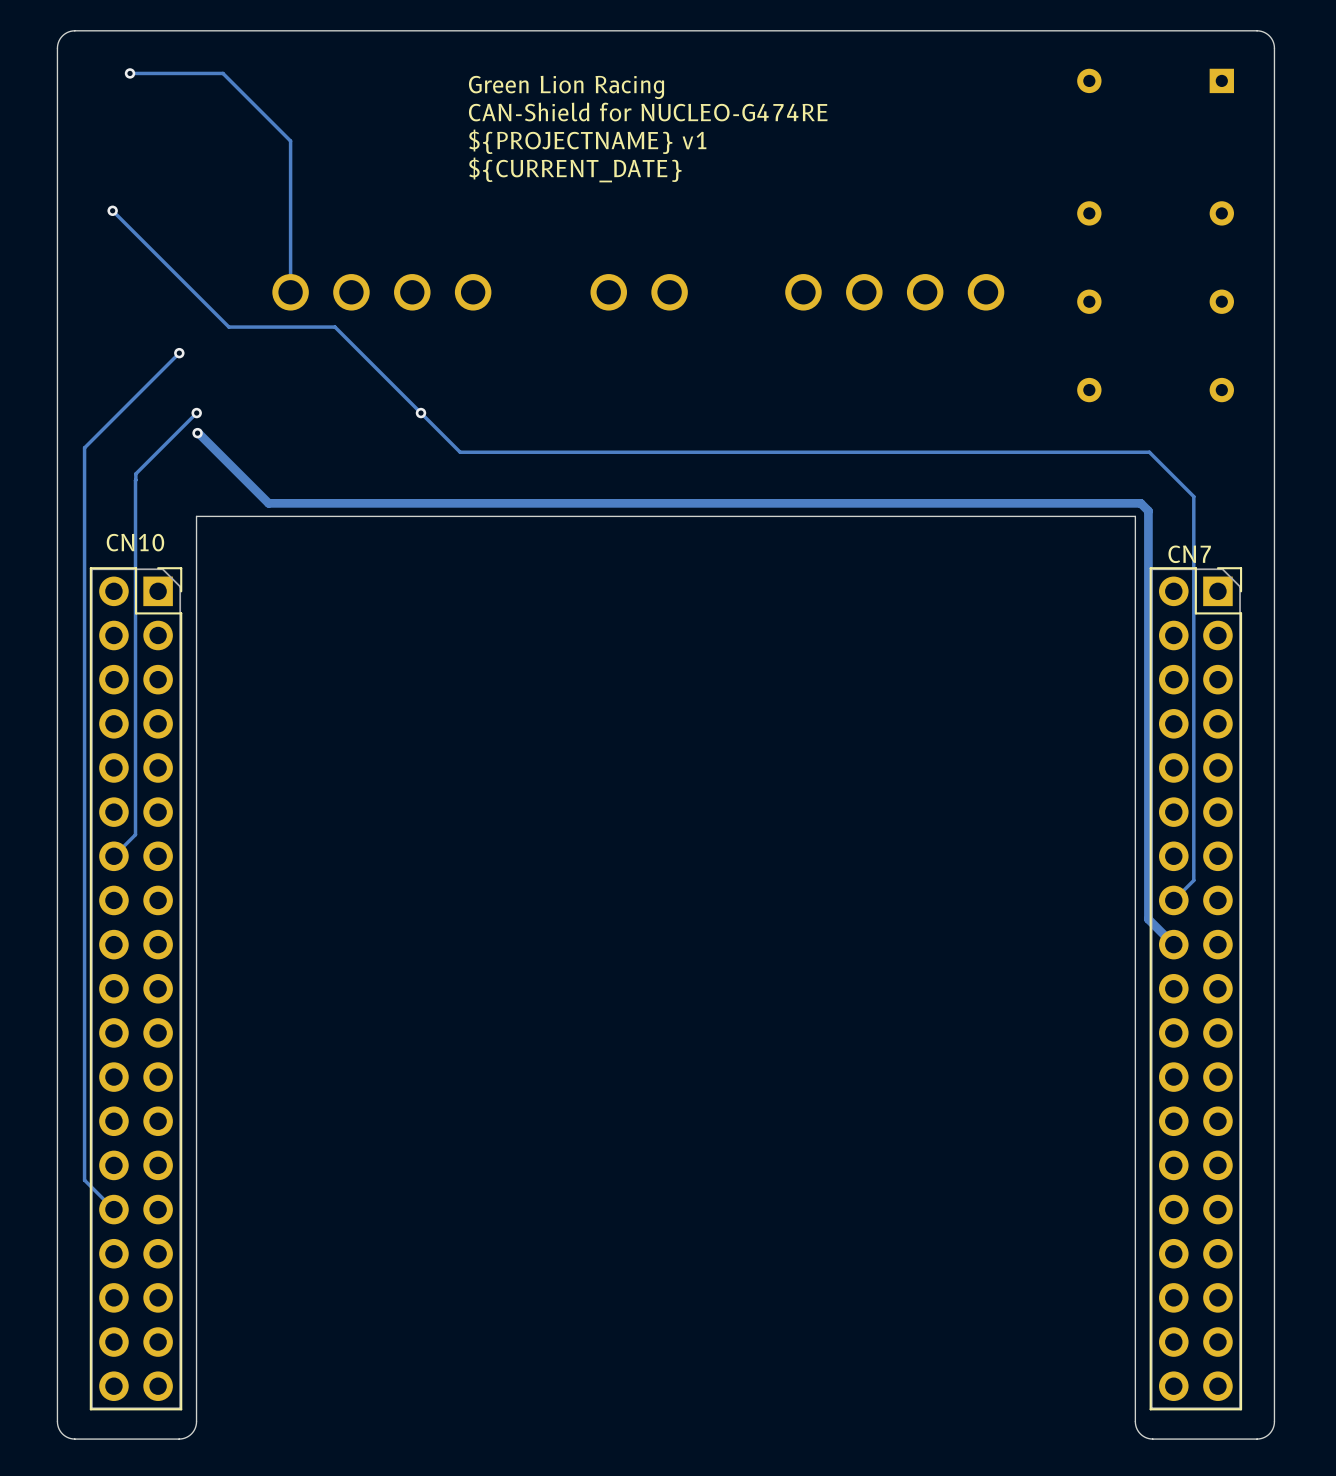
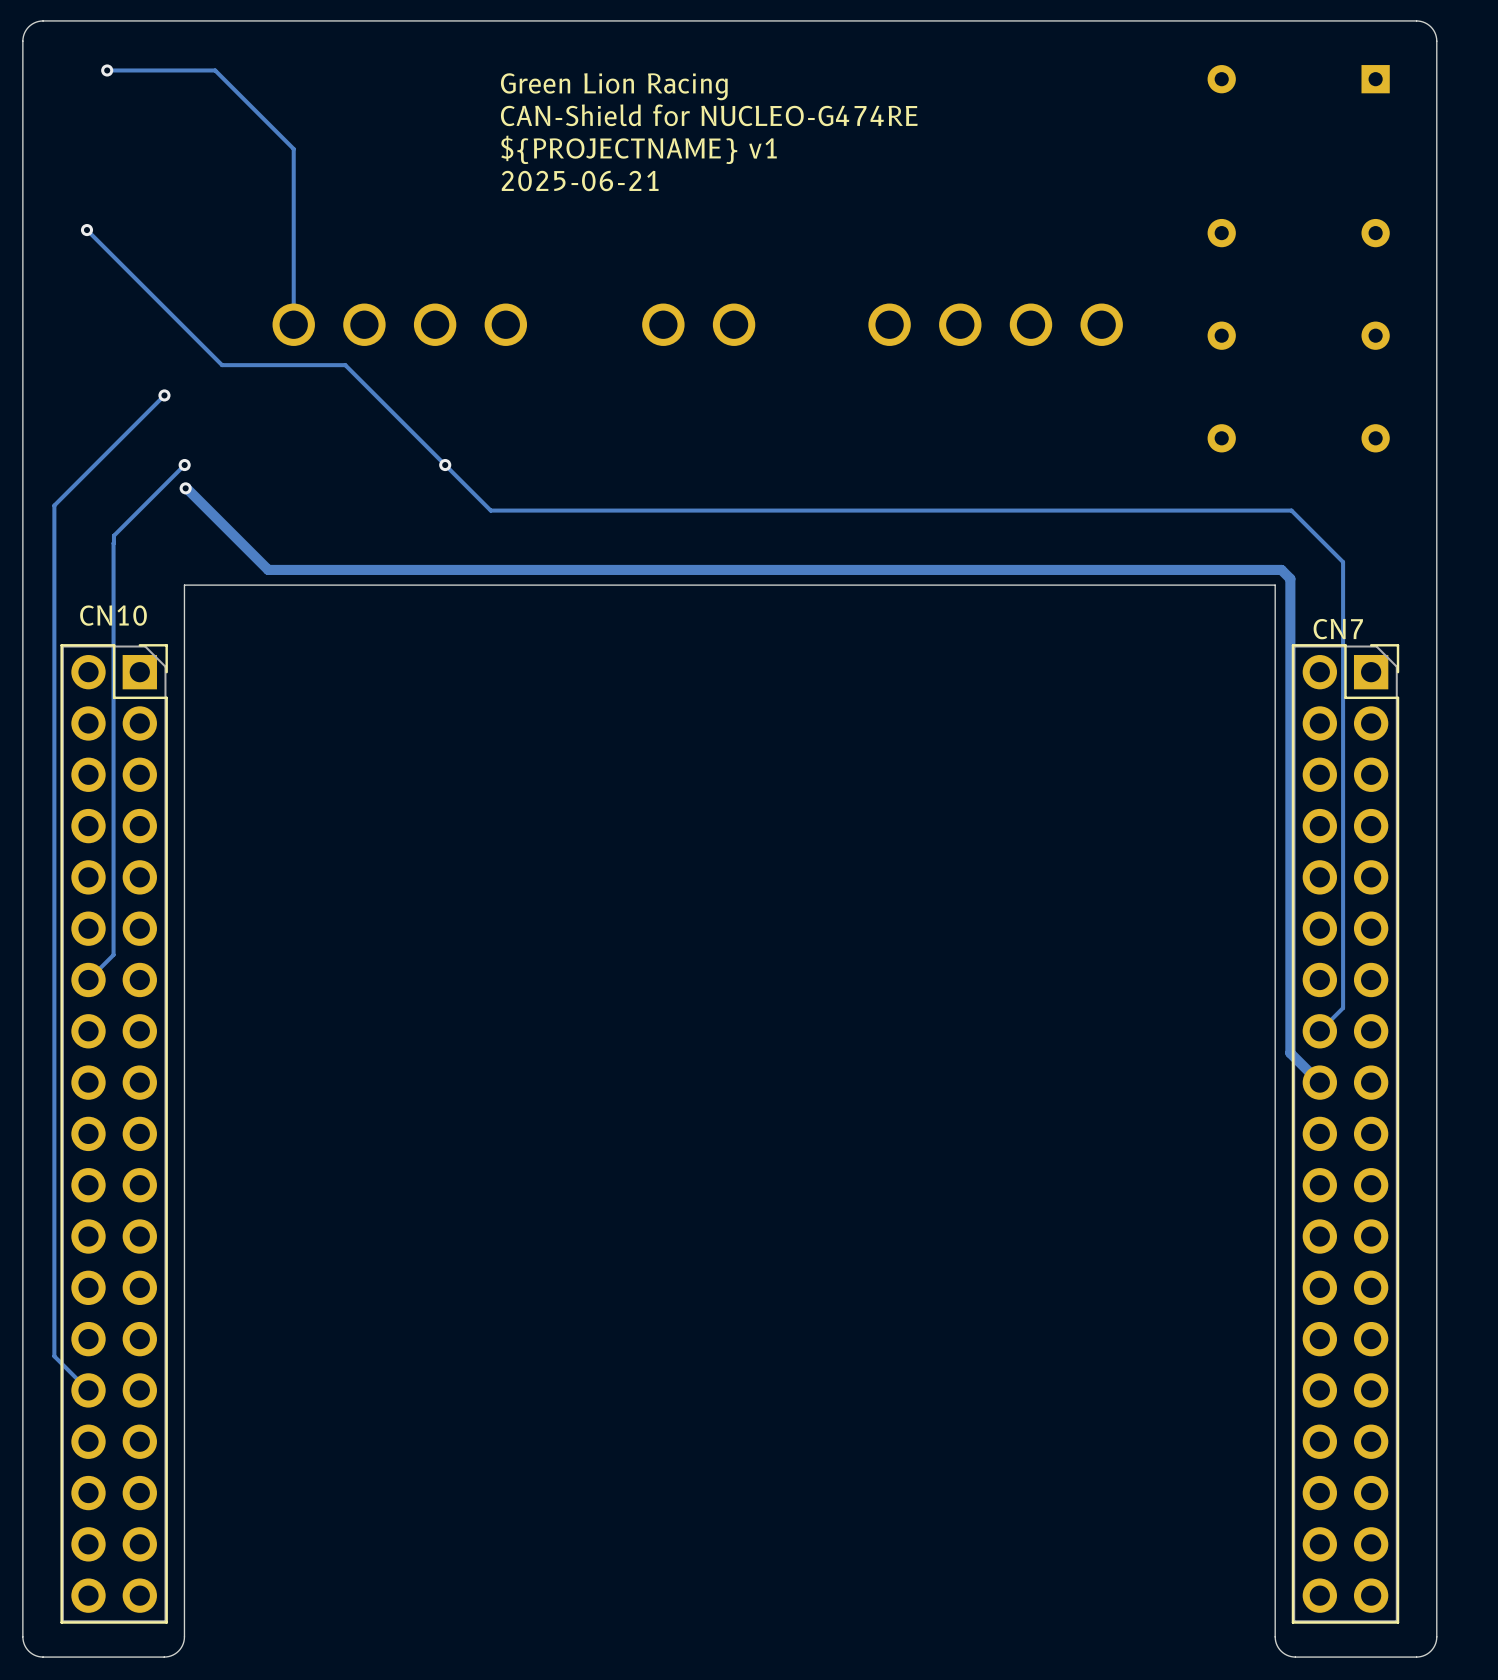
text: ${CURRENT_DATE} (575, 169) -> 2025-06-21 (580, 180)

